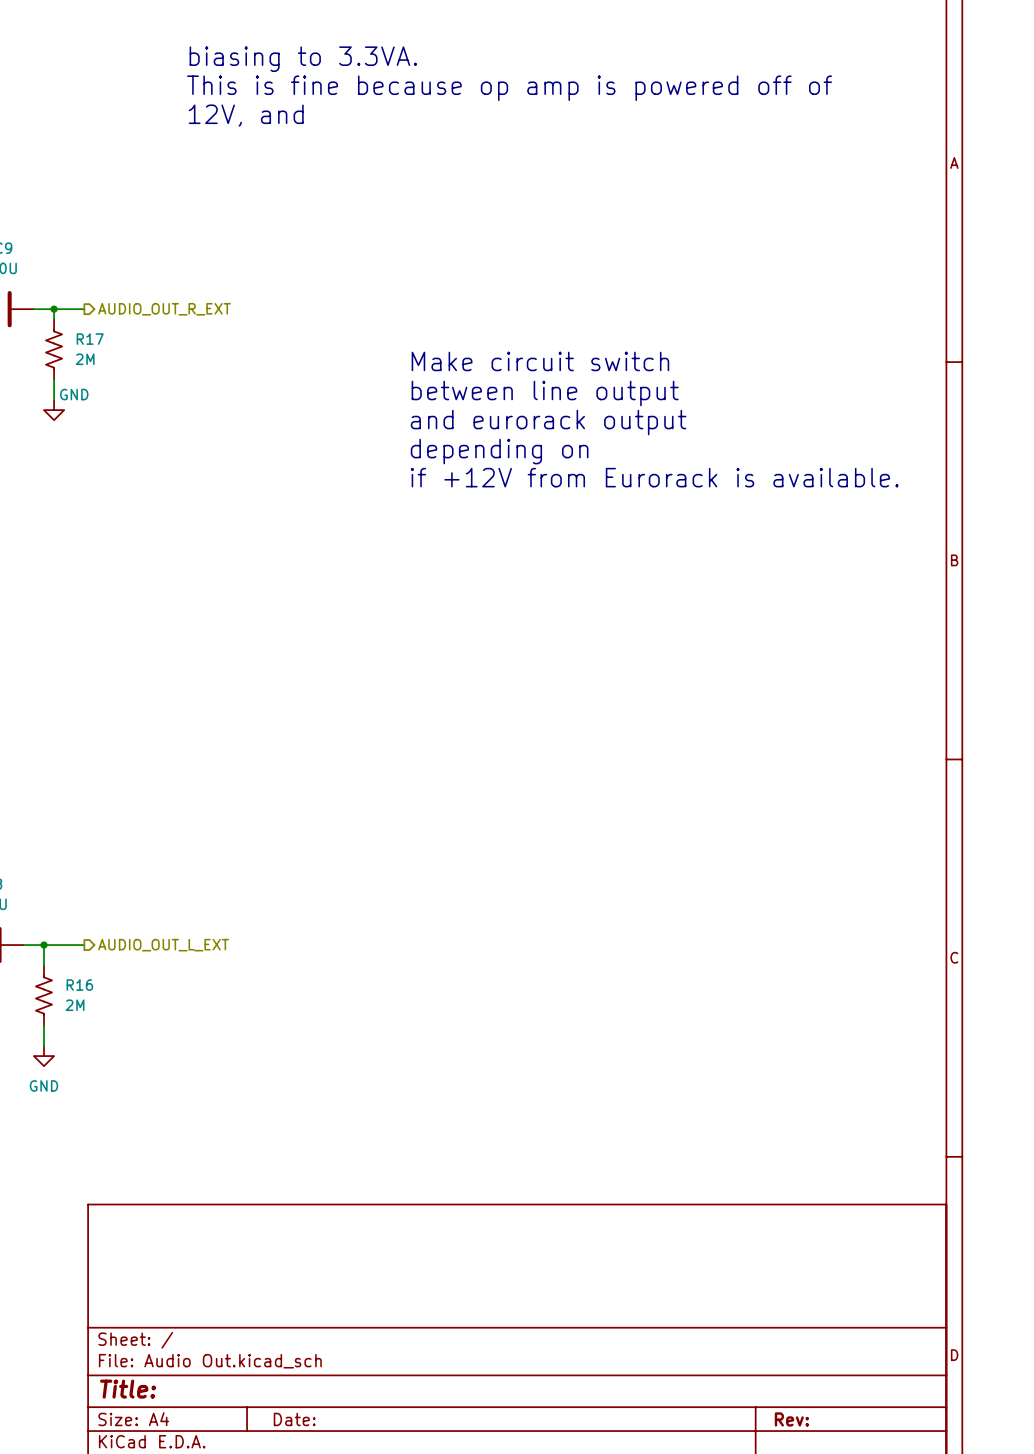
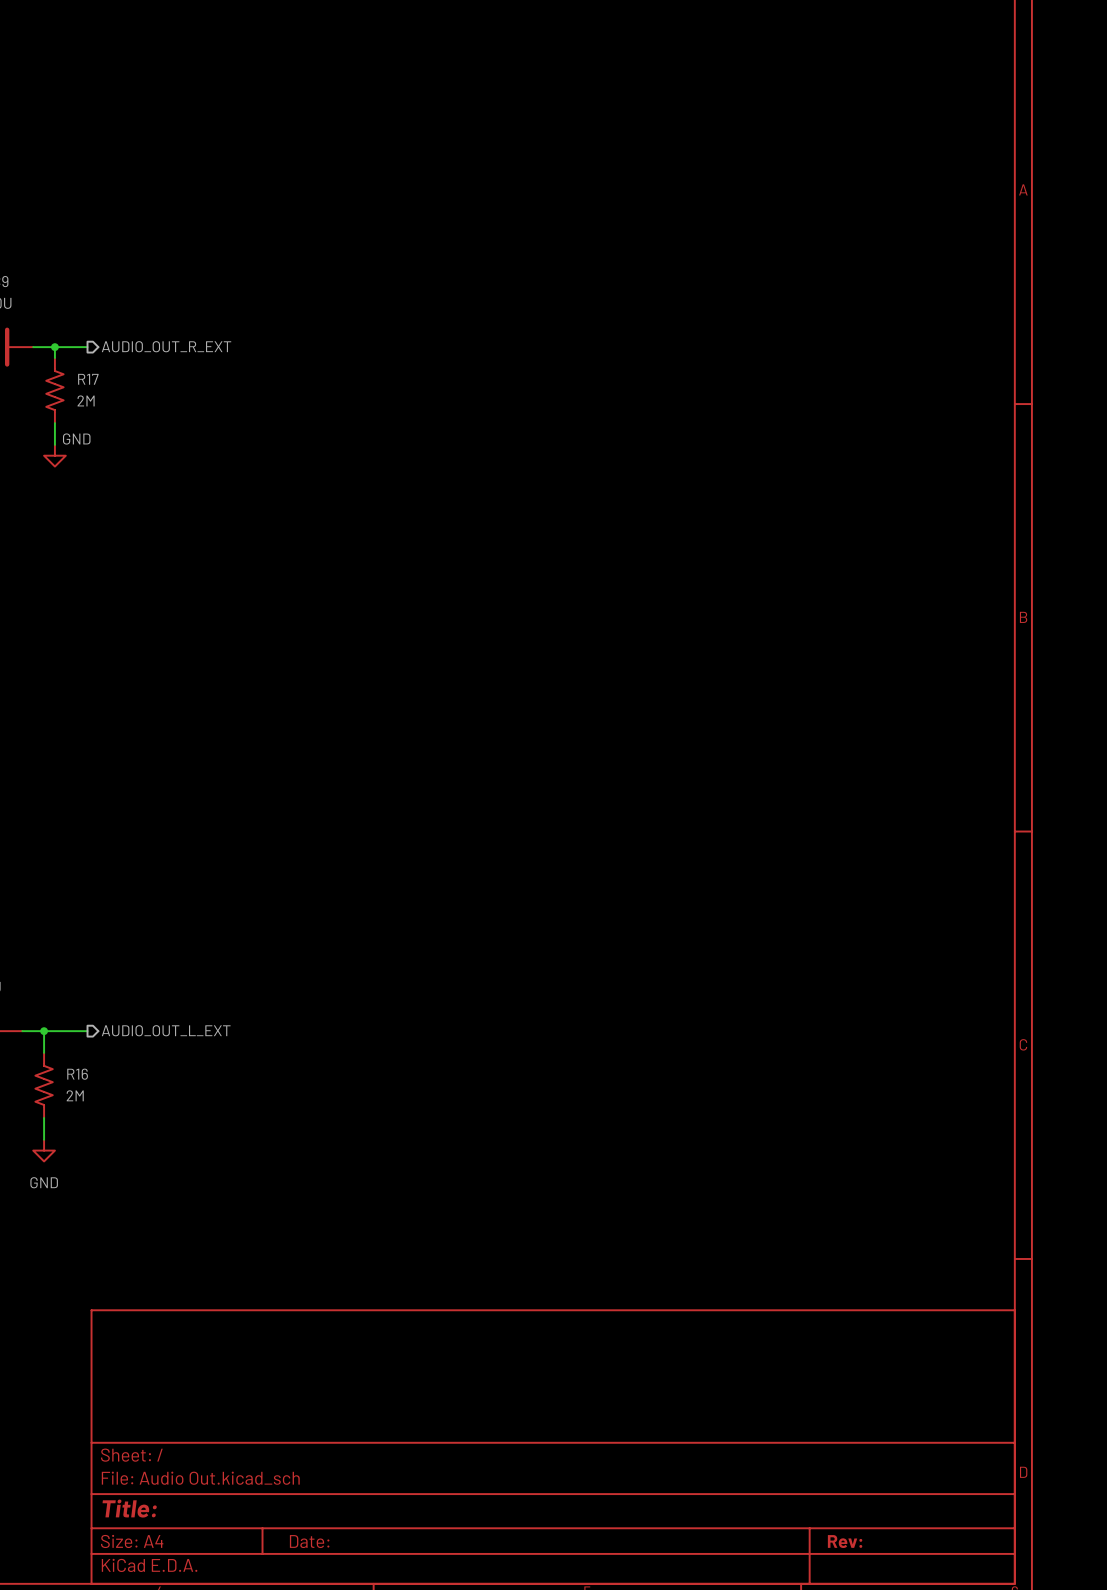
text: biasing to 3.3VA. (303, 59) -> none
text: This is fine because op amp is powered off of (509, 88) -> none
text: 12V, and (246, 115) -> none
text: Make circuit switch (540, 361) -> none
text: between line output (545, 393) -> none
text: and eurorack output (548, 422) -> none
text: depending on (499, 451) -> none
text: if +12V from Eurorack is available. (654, 477) -> none

